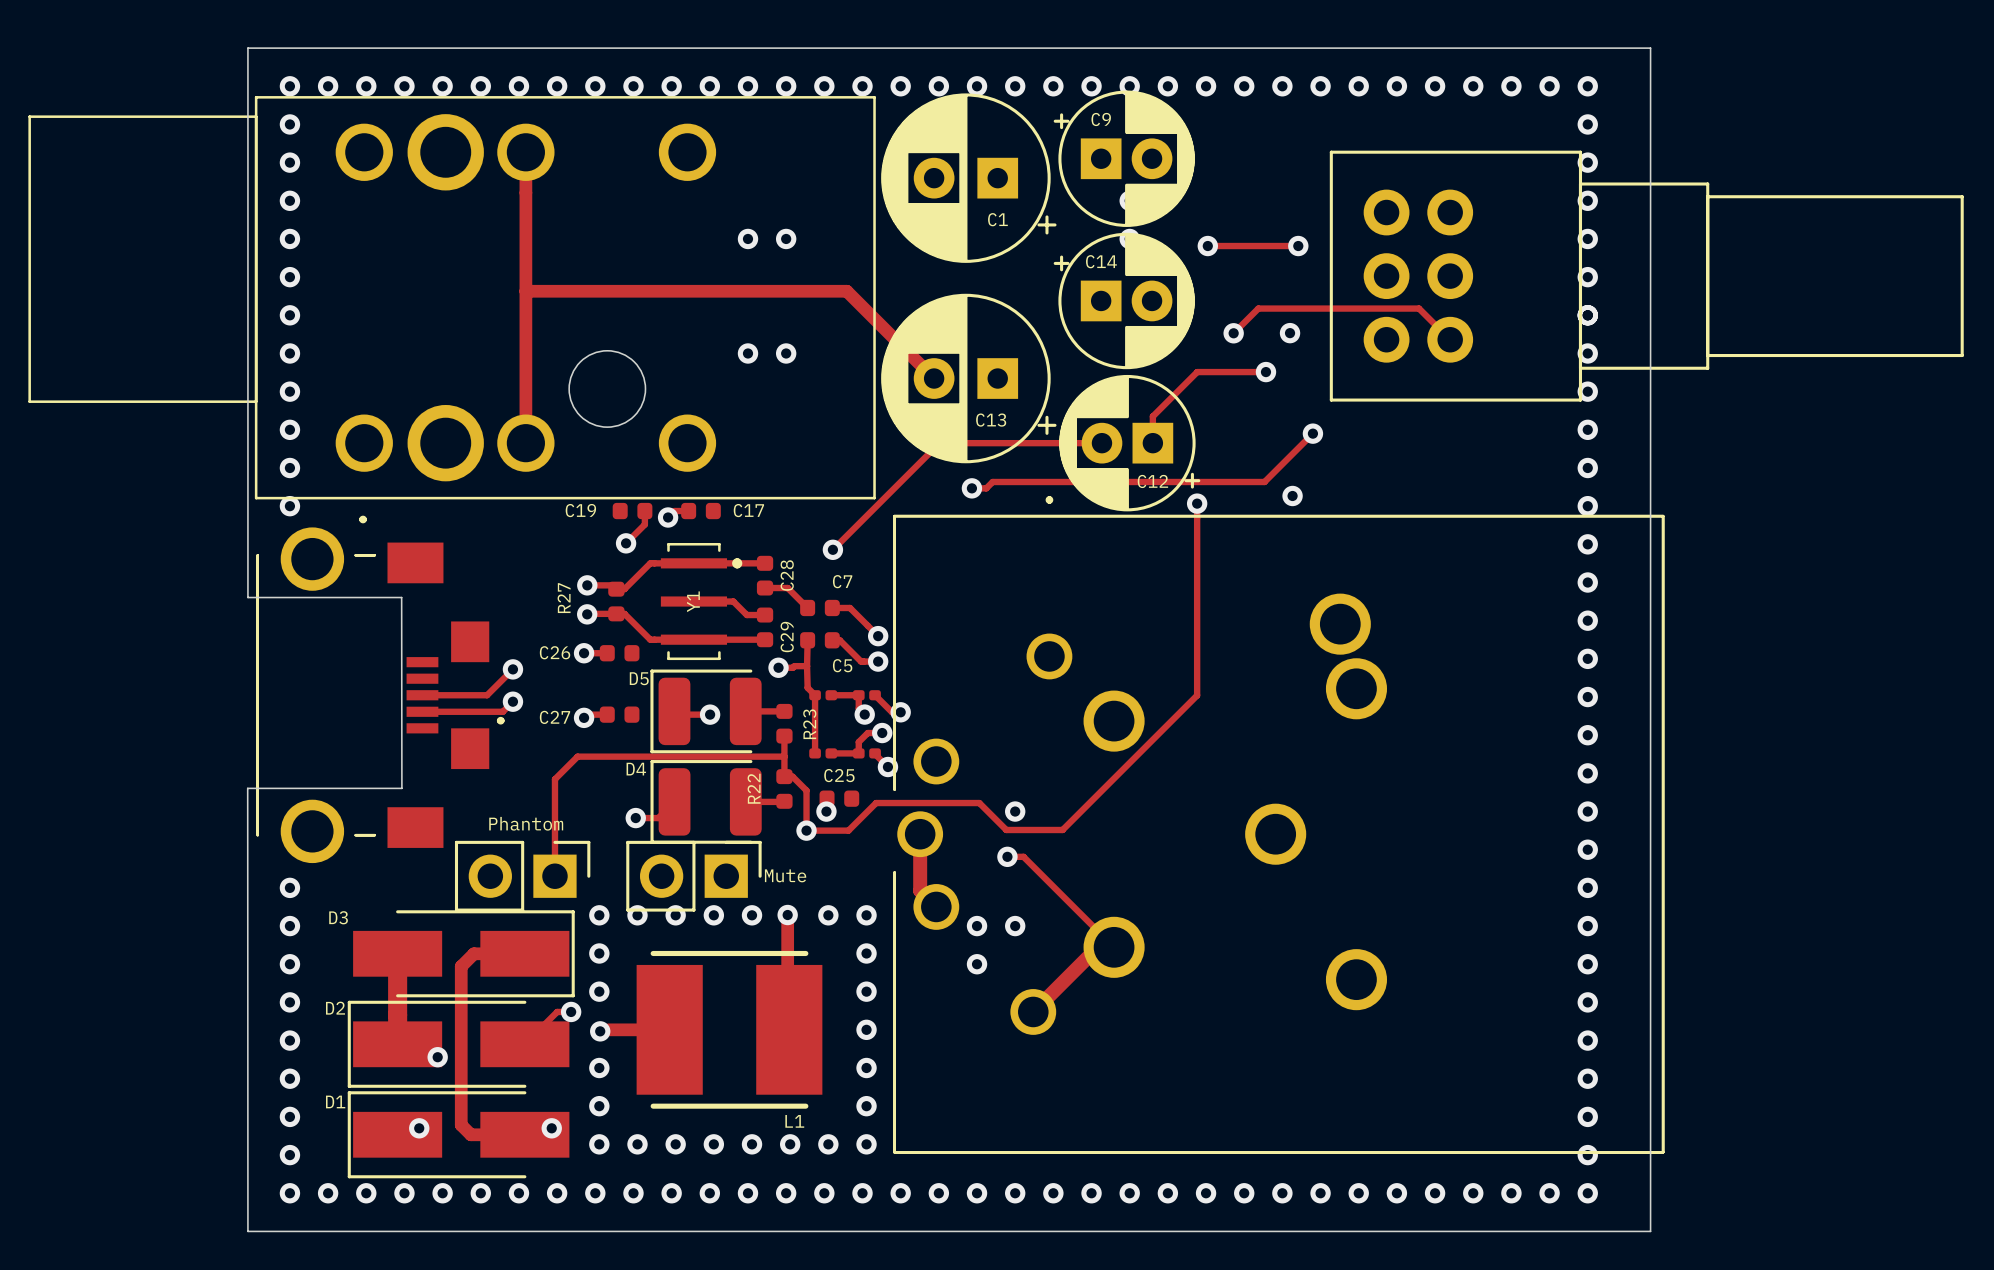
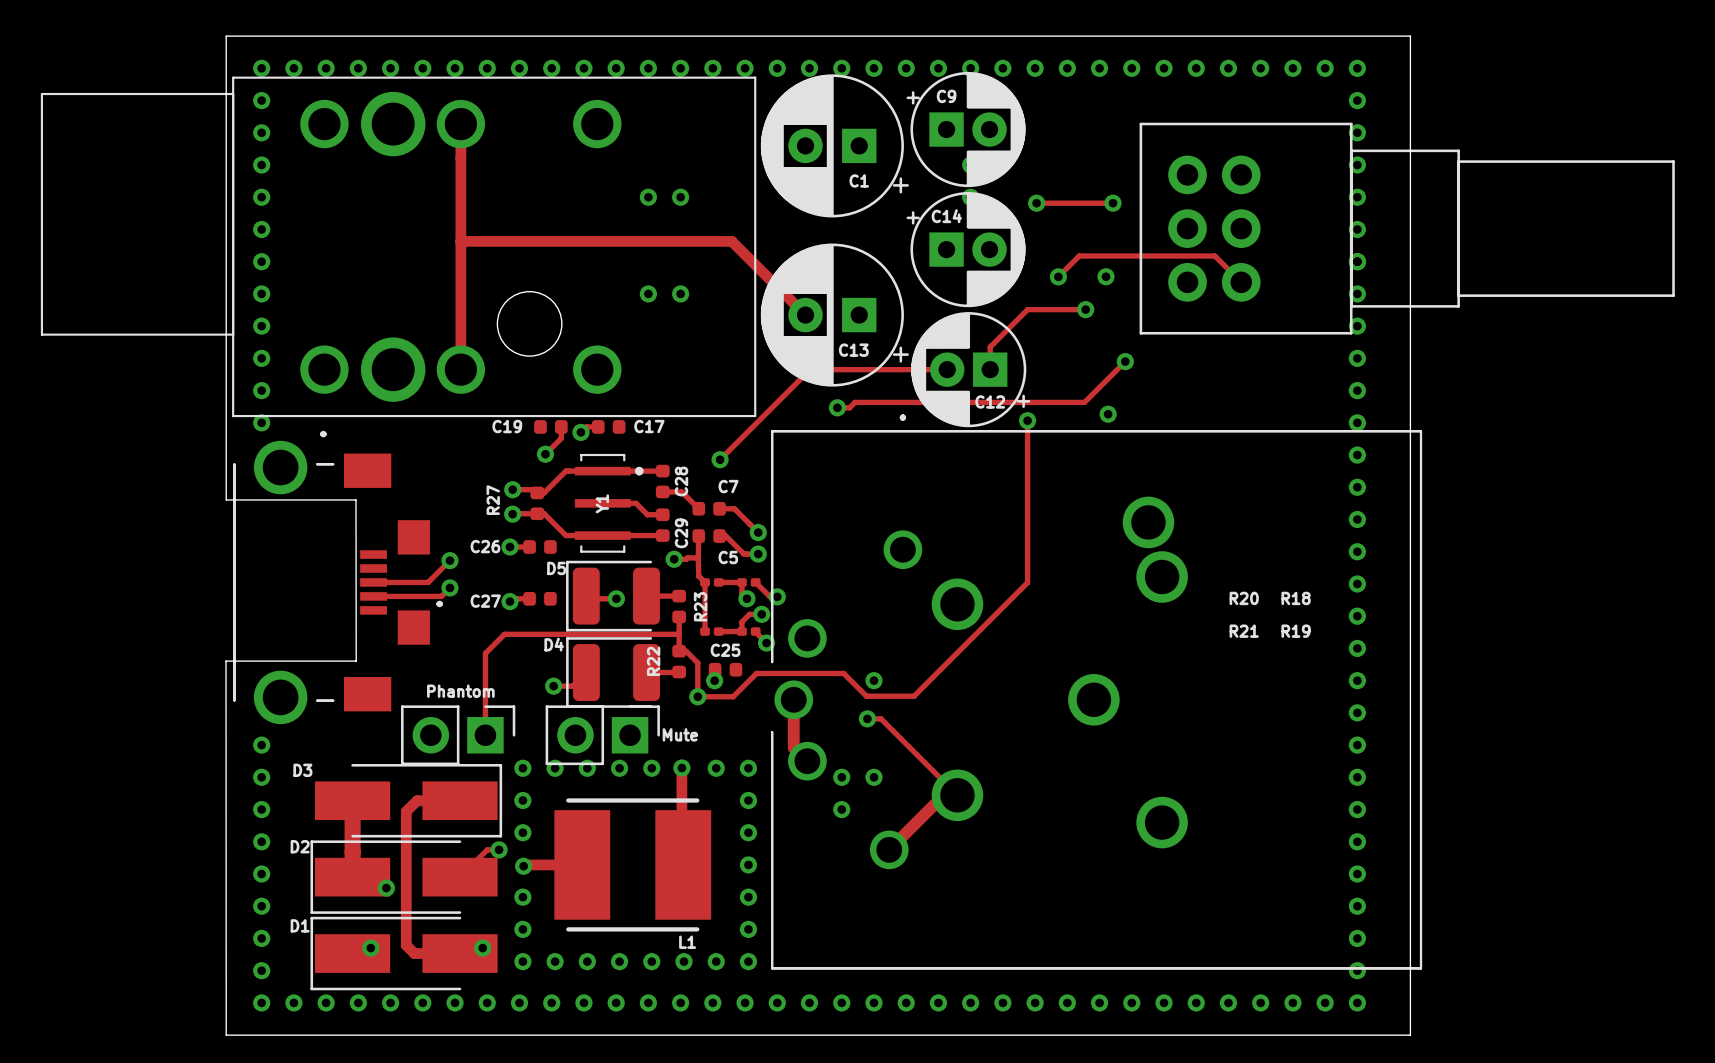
R20 name: none -> R20 (1244, 598)
R18 name: none -> R18 (1296, 598)
R21 name: none -> R21 (1244, 631)
R19 name: none -> R19 (1296, 631)

